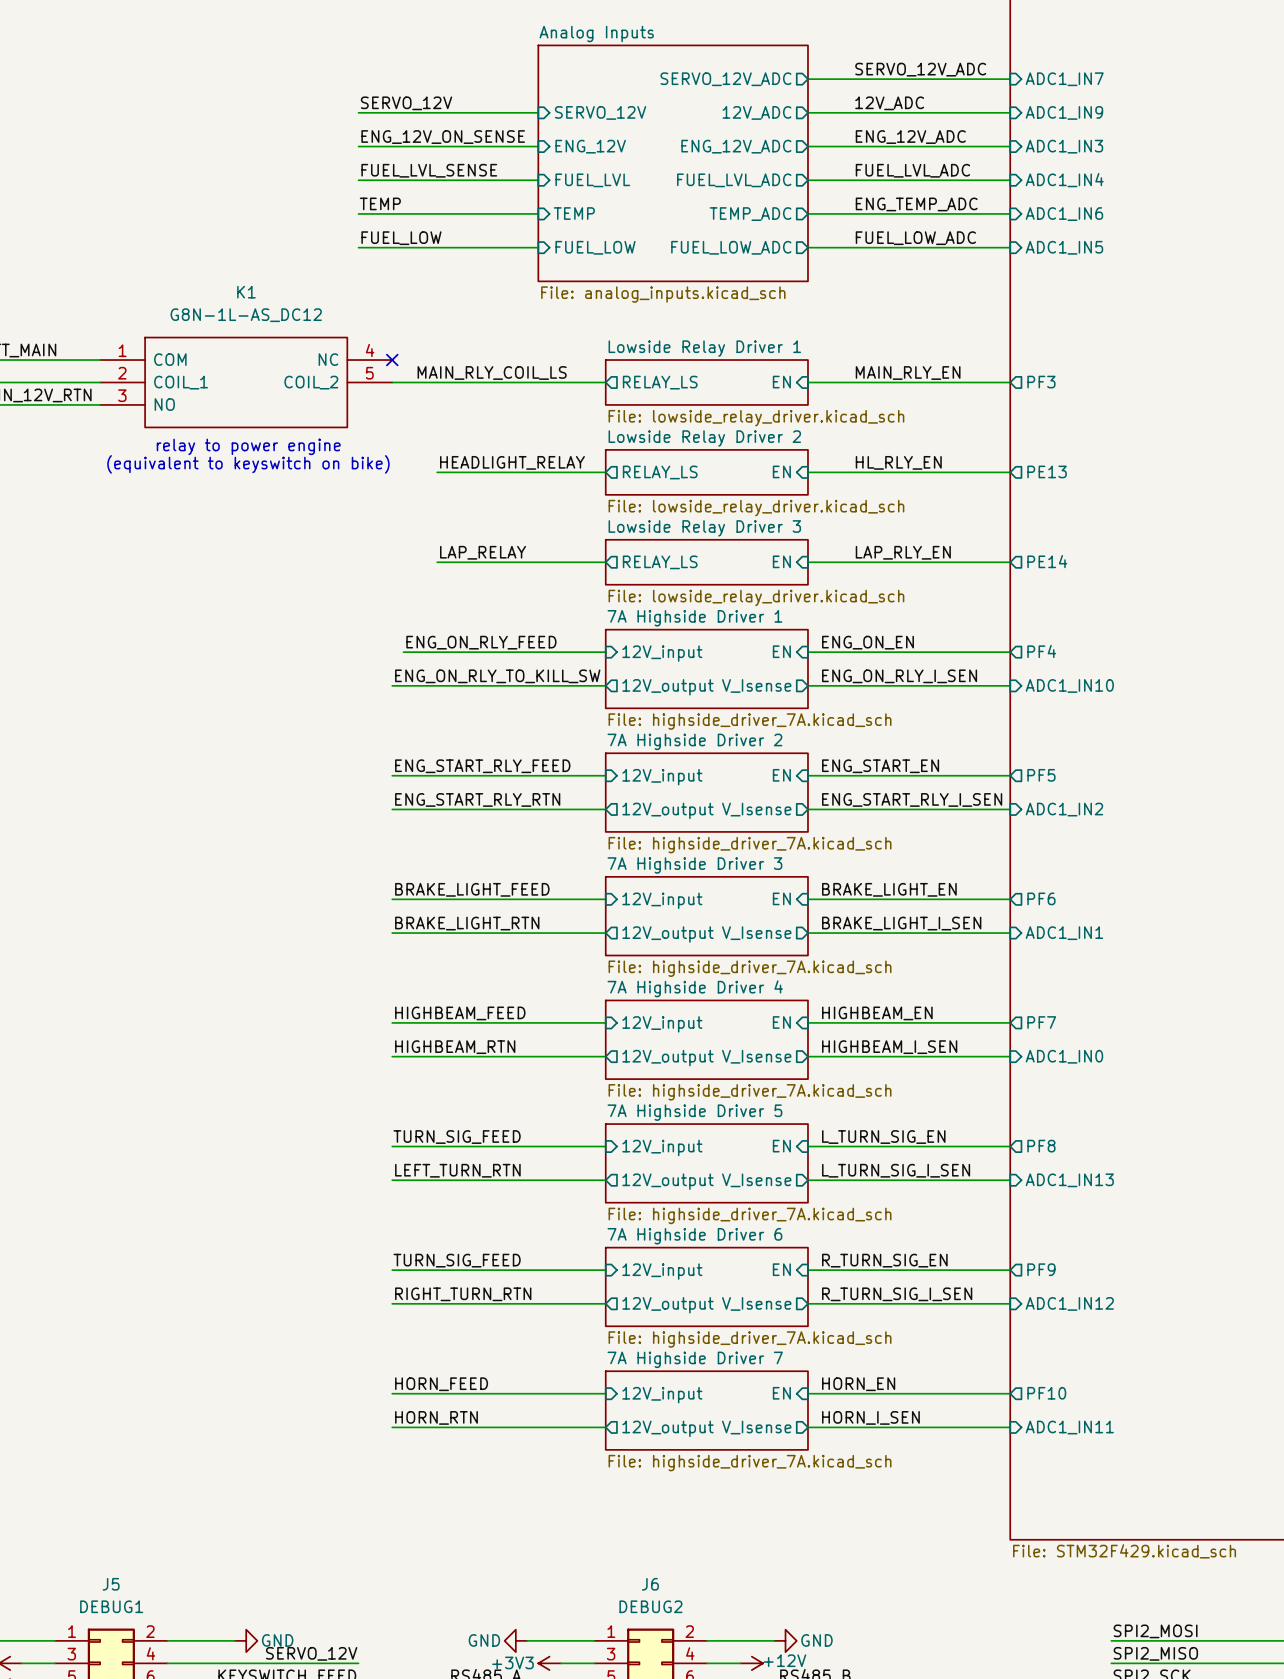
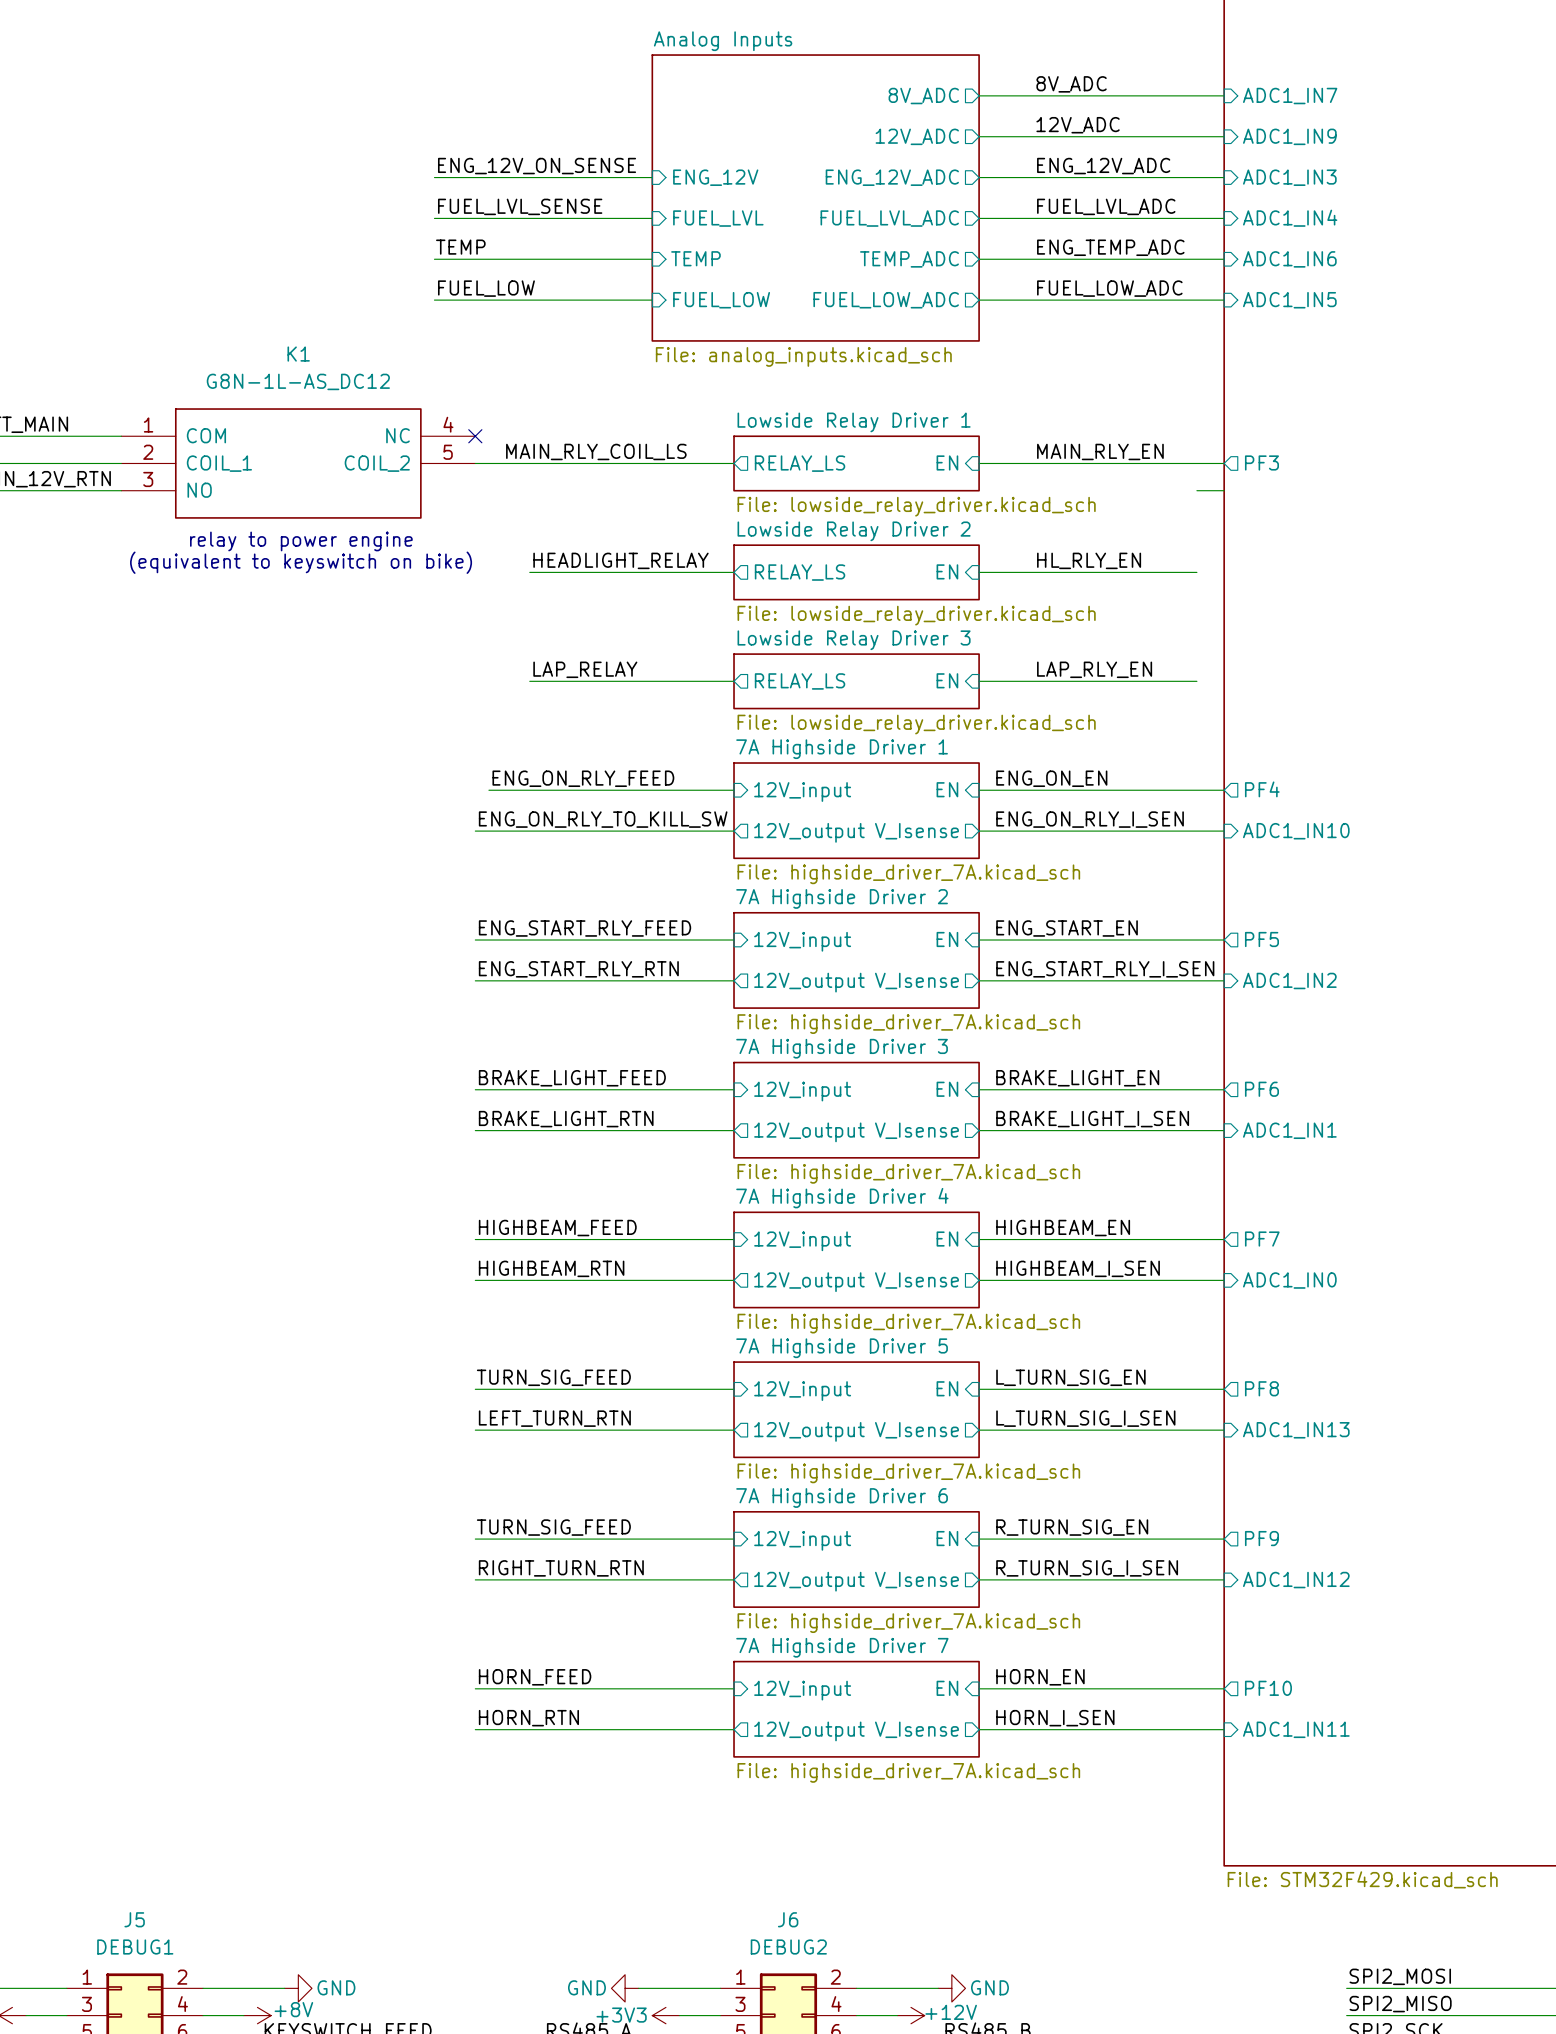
label: SERVO_12V_ADC (920, 69) -> 8V_ADC (1071, 84)
sheet pin: SERVO_12V_ADC (725, 79) -> 8V_ADC (923, 96)
label: SERVO_12V (406, 103) -> none
wire: (358, 112) (538, 112) -> none
sheet pin: SERVO_12V (600, 112) -> none
sheet pin: PE13 (1047, 471) -> none
wire: (987, 472) (1010, 472) -> (1196, 490) (1224, 490)
sheet pin: PE14 (1047, 561) -> none
wire: (987, 562) (1010, 562) -> none
label: SERVO_12V (311, 1653) -> none
wire: (201, 1663) (358, 1663) -> none
power symbol: none -> +8V (257, 2015)

